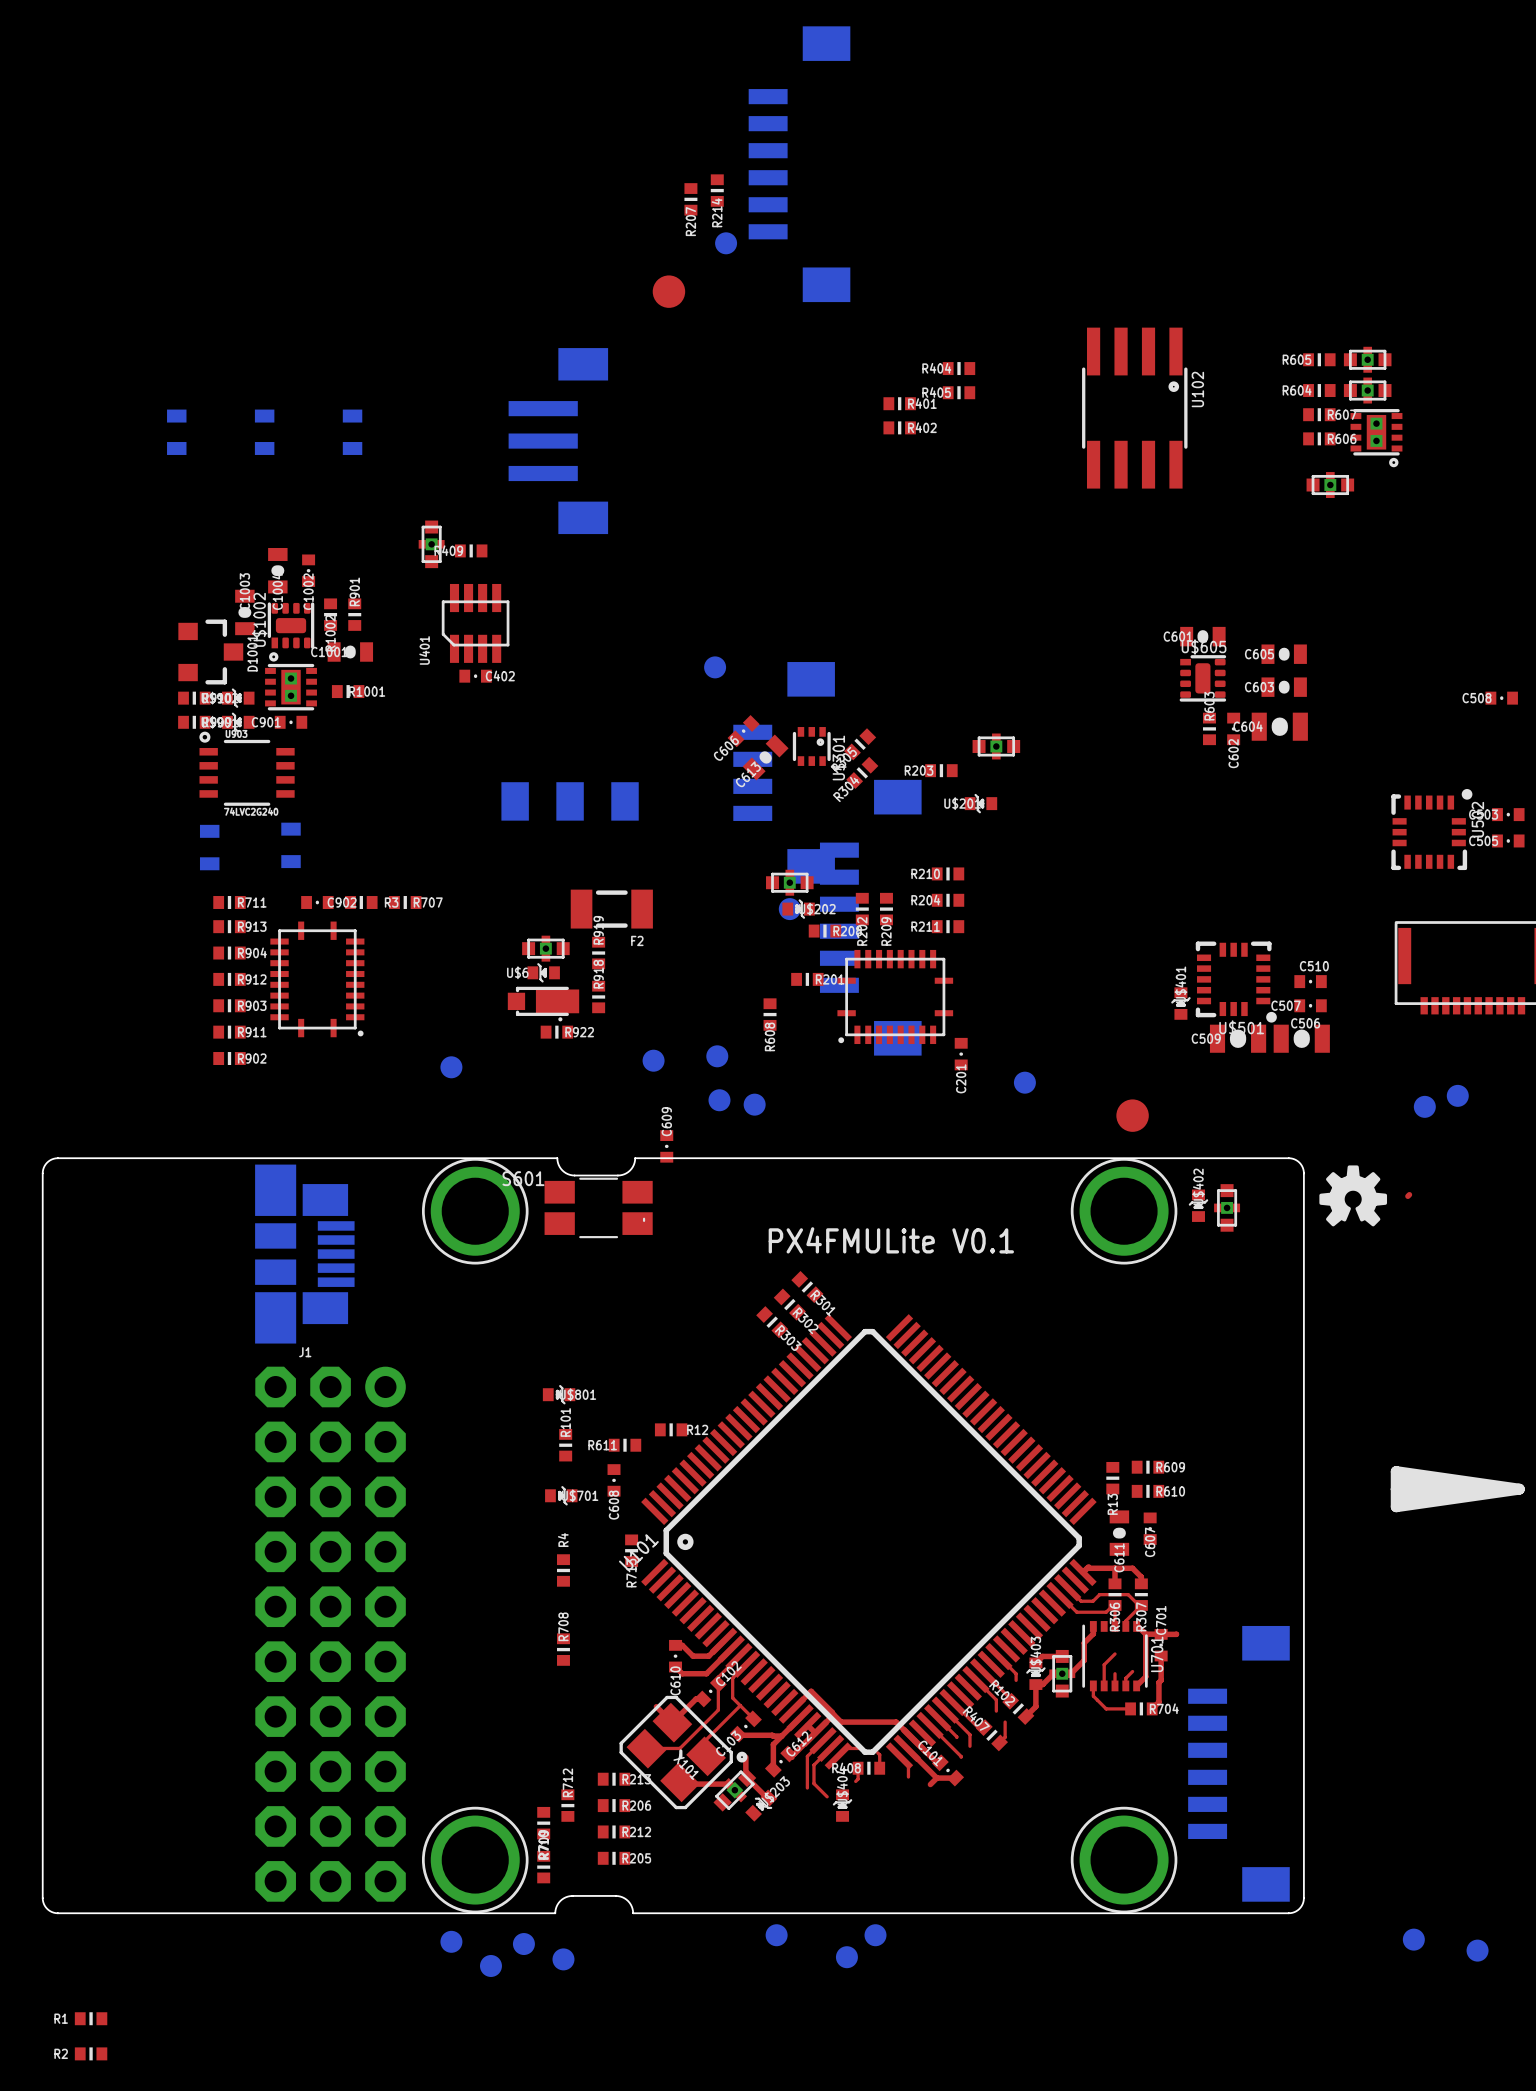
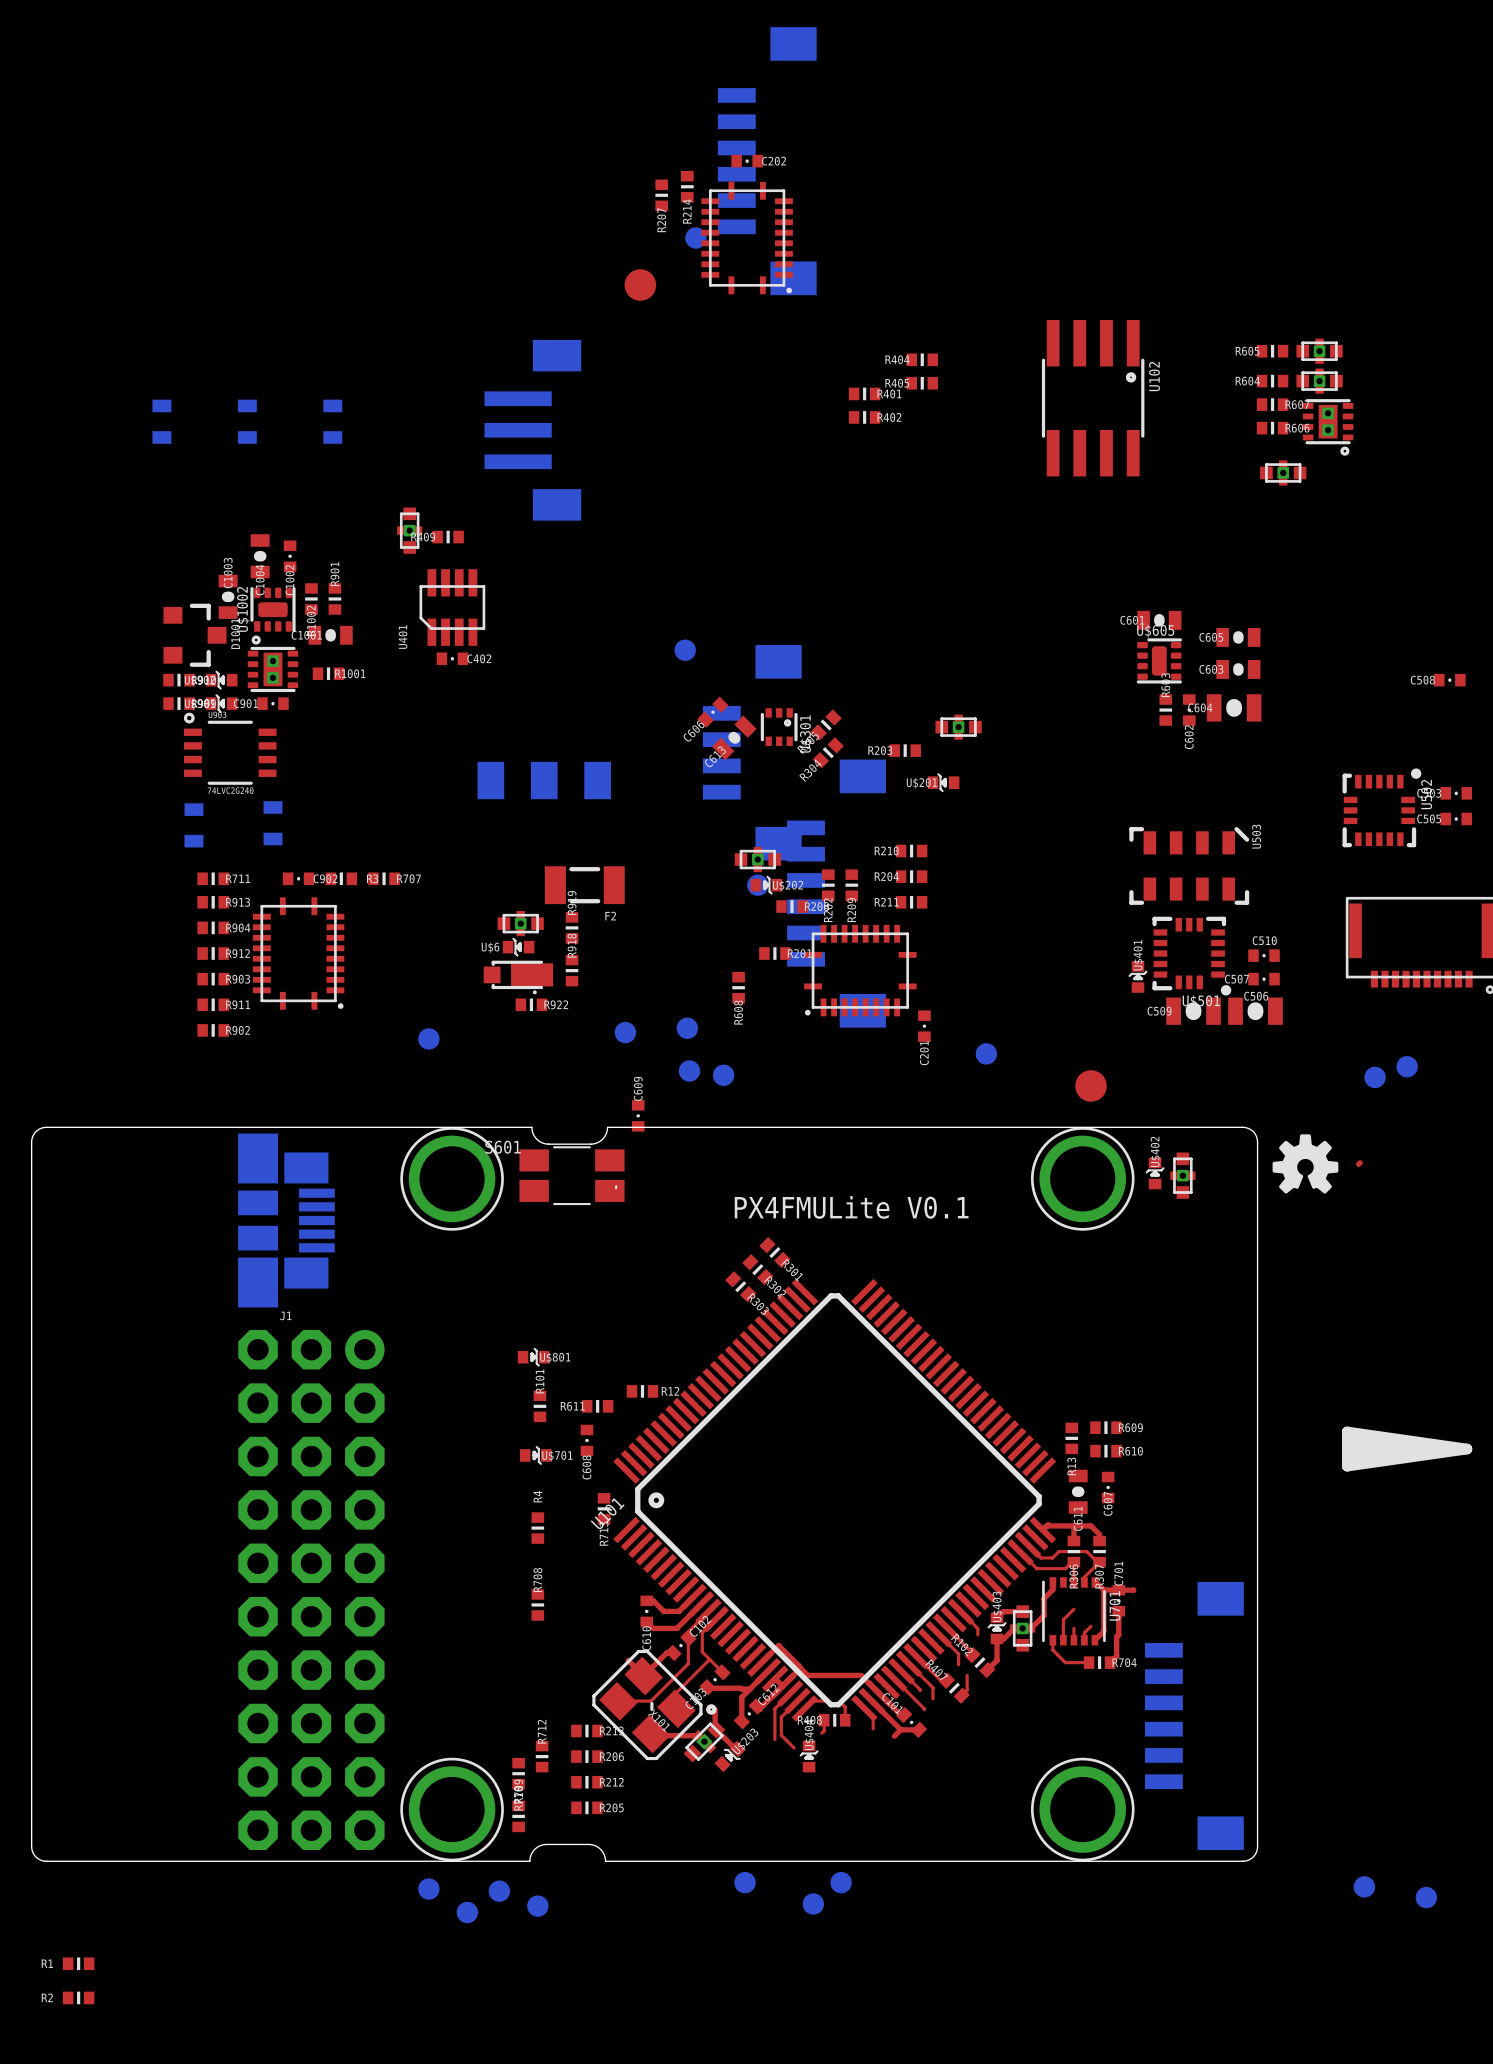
C202: none -> (747, 161)
part: none -> (747, 238)
U503: none -> (1189, 865)

